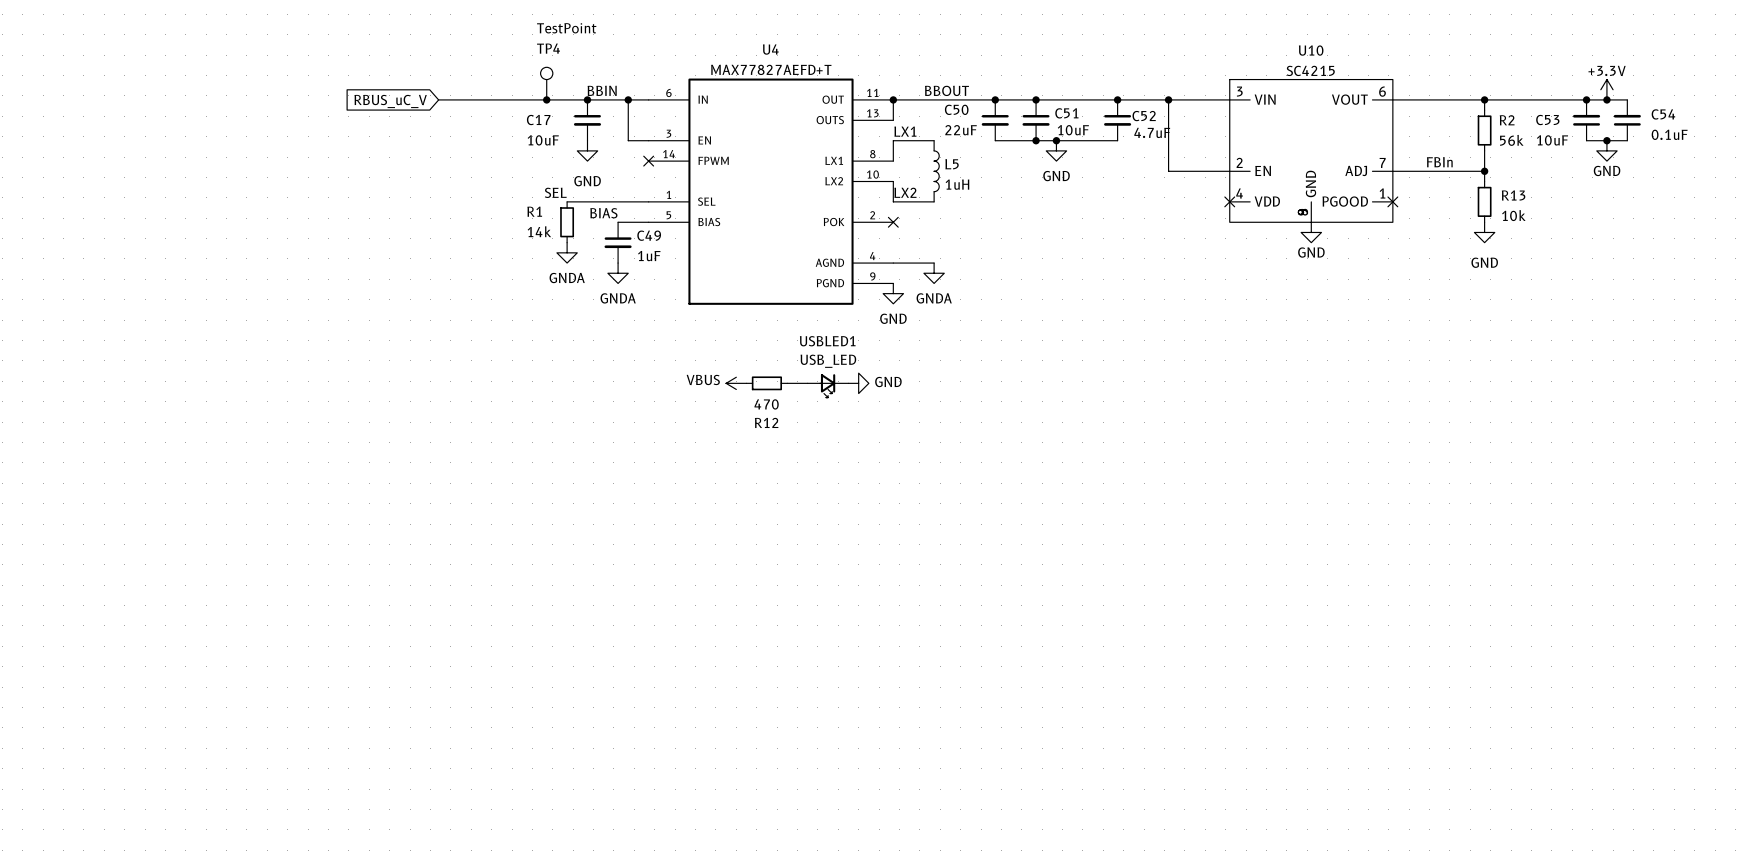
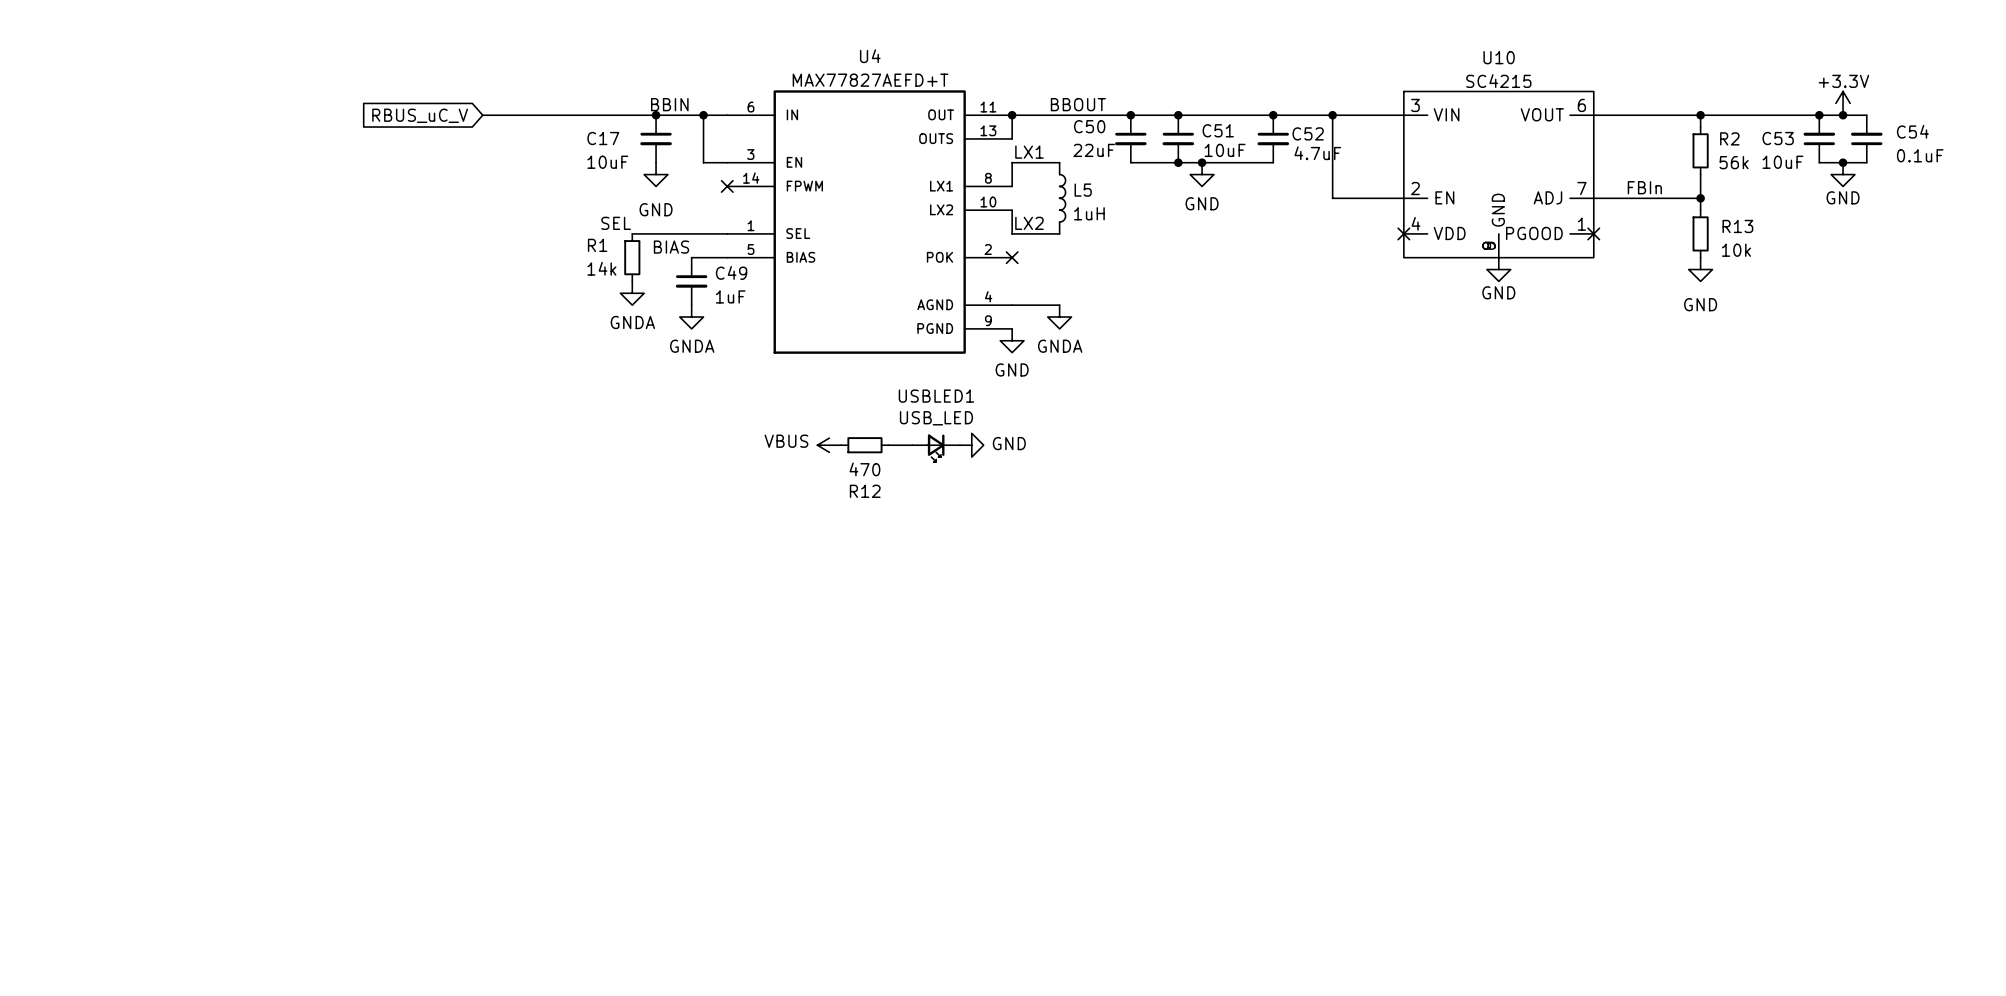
TP4: TestPoint (546, 83) -> none
junction: (546, 99) -> none

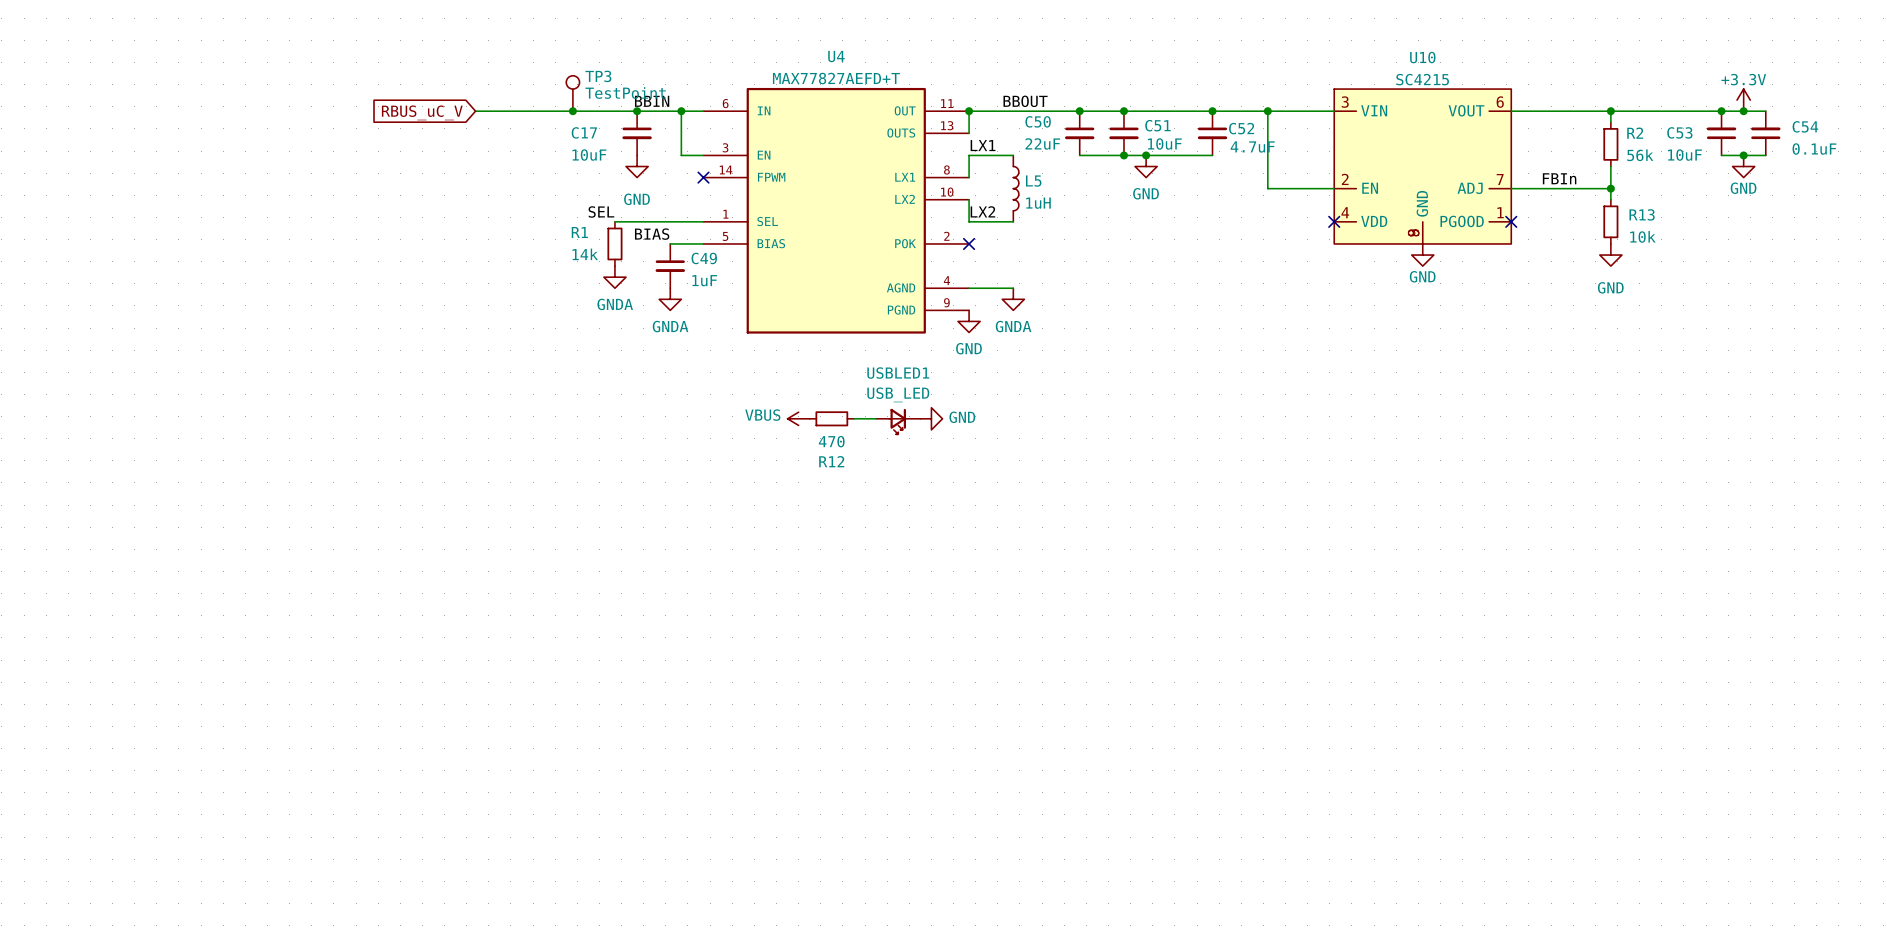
TP3: none -> TestPoint (572, 93)
junction: none -> (572, 111)

